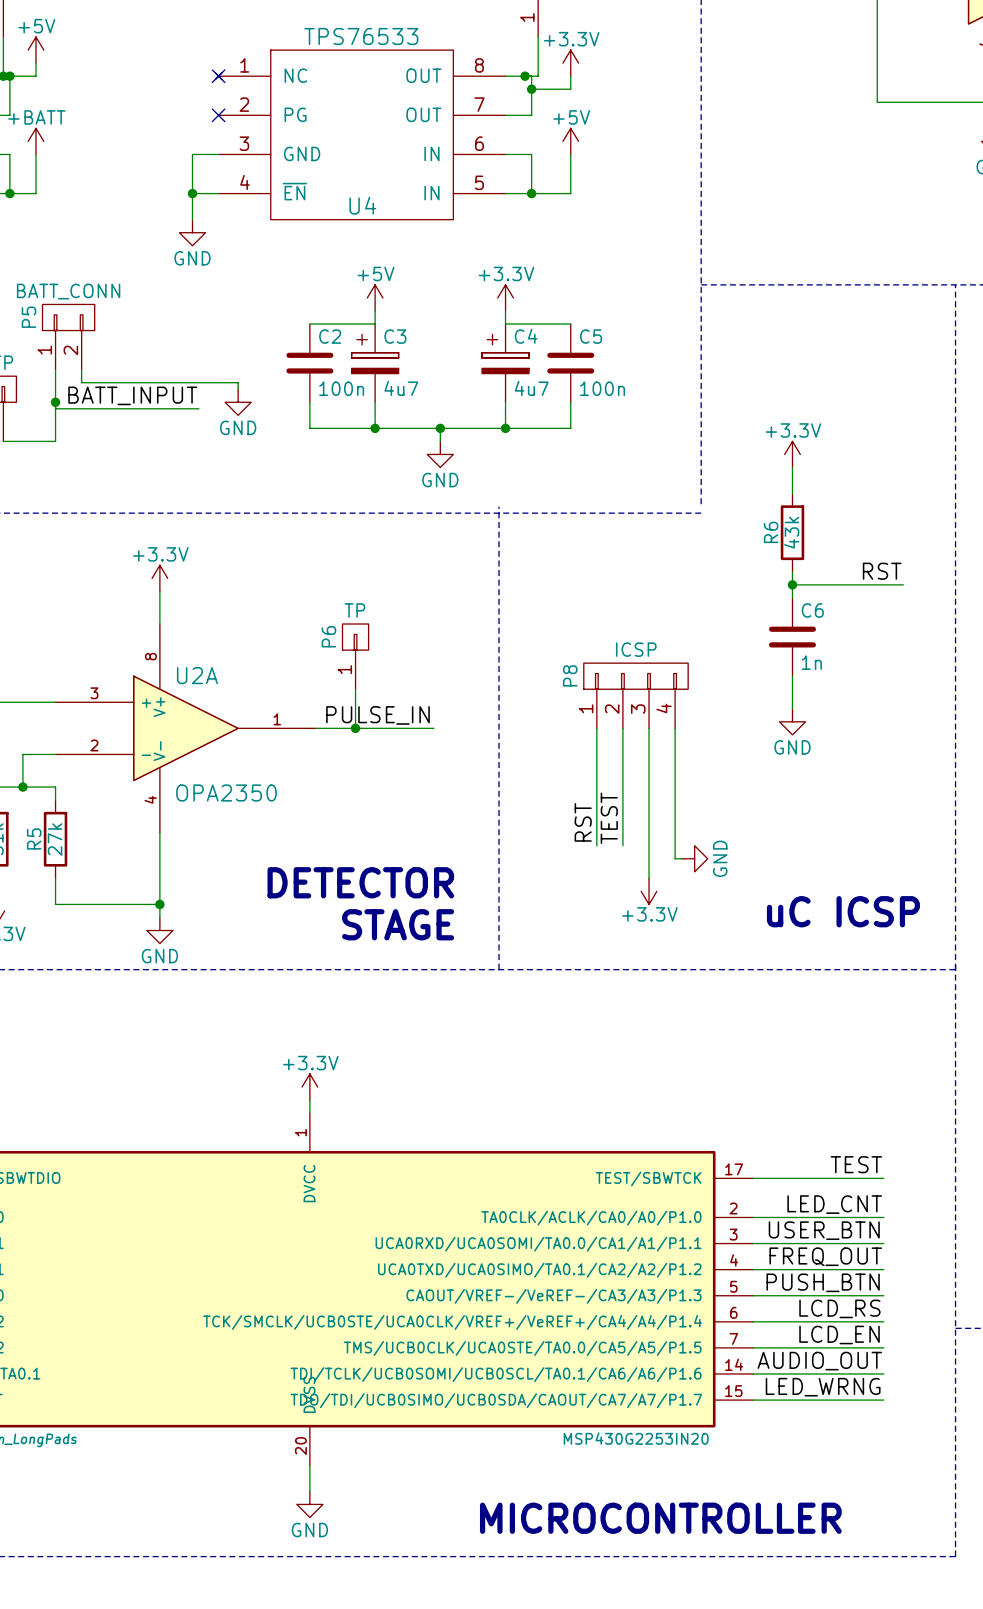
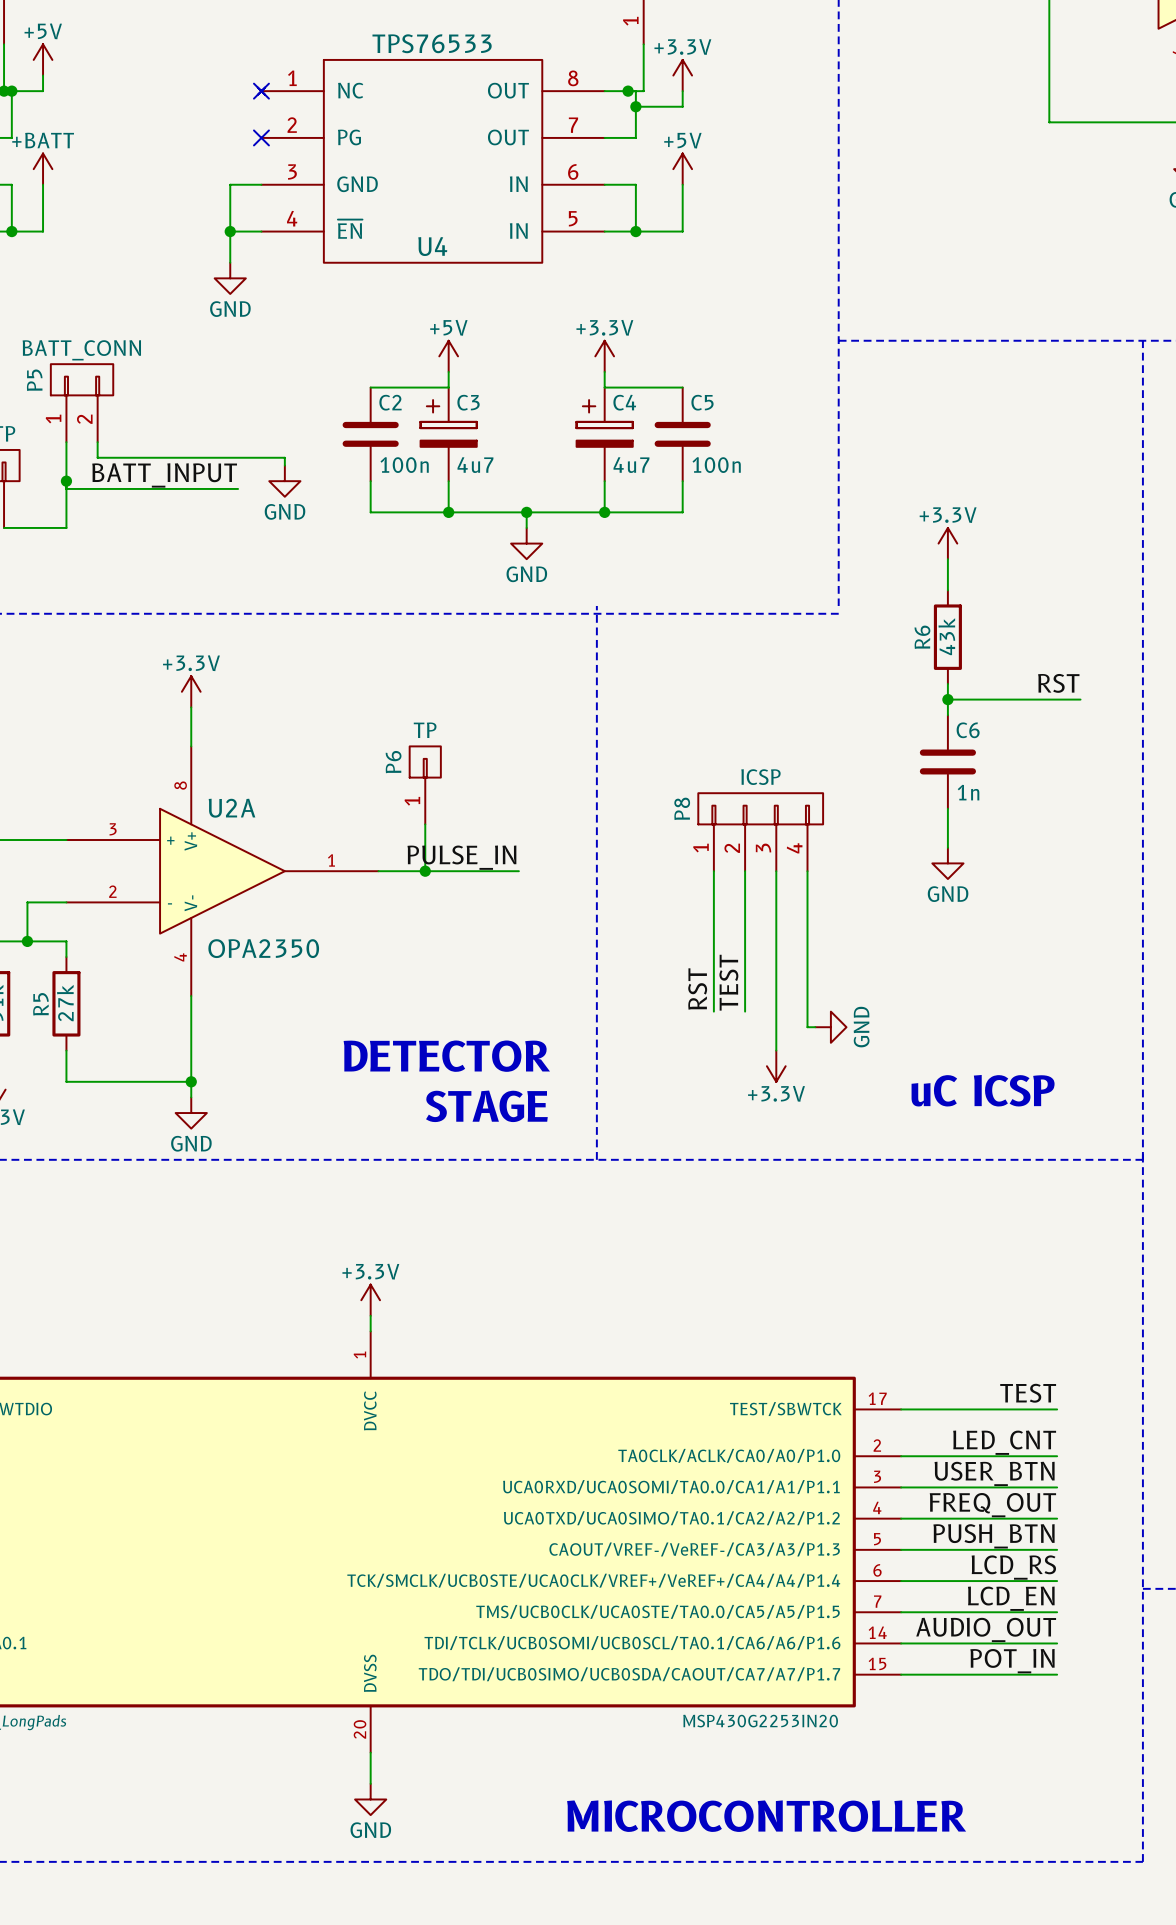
label: LED_WRNG (823, 1387) -> POT_IN (1012, 1661)

